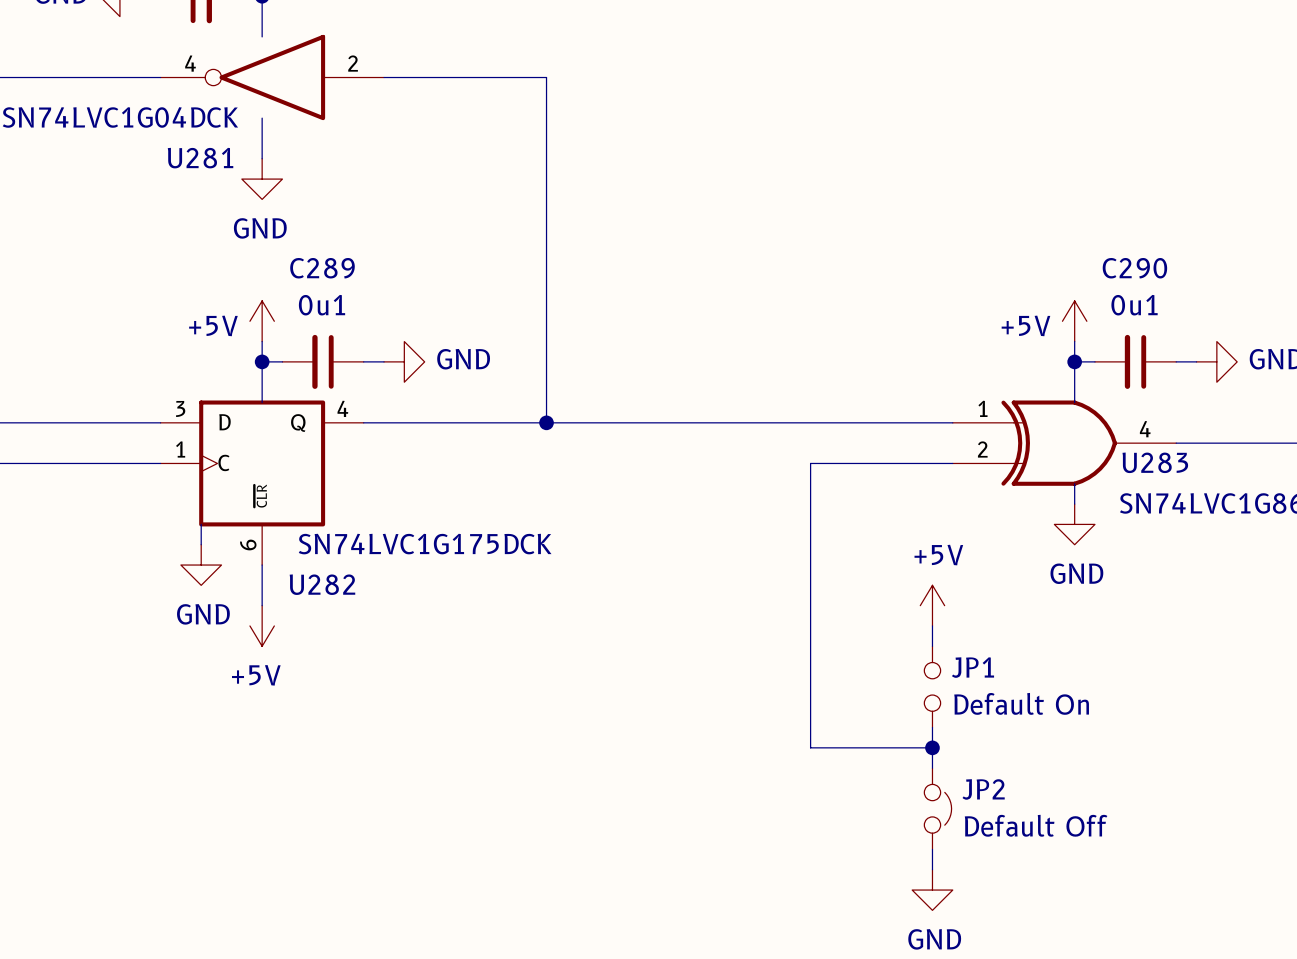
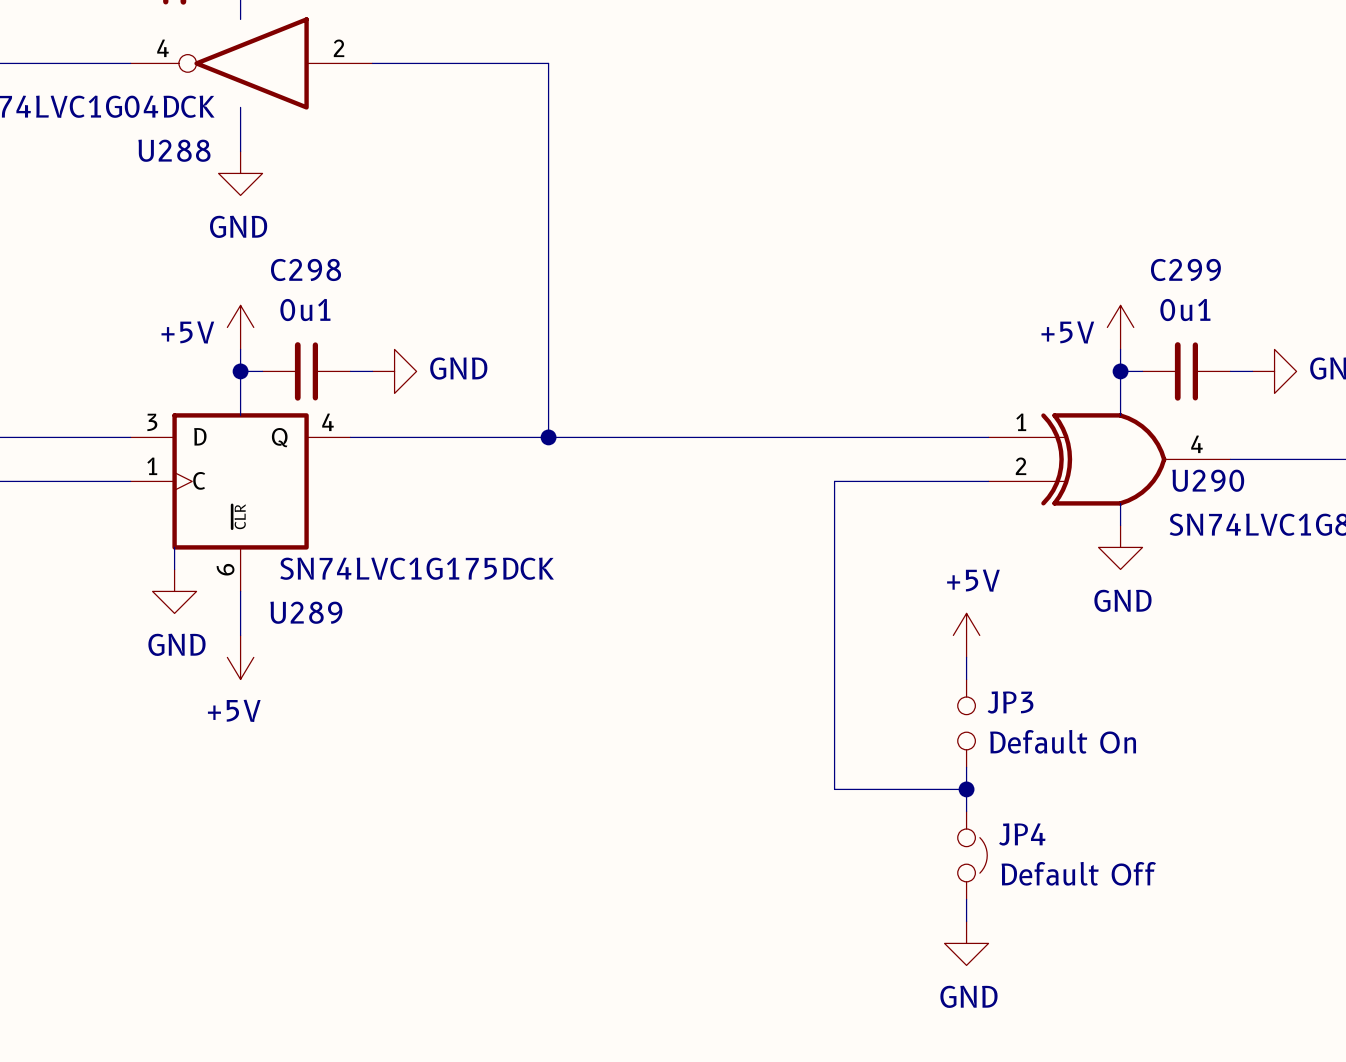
U281 name: U281 (200, 158) -> U288 (174, 150)
C289 name: C289 (322, 268) -> C298 (306, 269)
C290 name: C290 (1134, 268) -> C299 (1185, 269)
U283 name: U283 (1155, 462) -> U290 (1208, 480)
U282 name: U282 (322, 584) -> U289 (306, 612)
JP1 name: JP1 (973, 667) -> JP3 (1010, 702)
JP2 name: JP2 (983, 789) -> JP4 (1022, 834)

